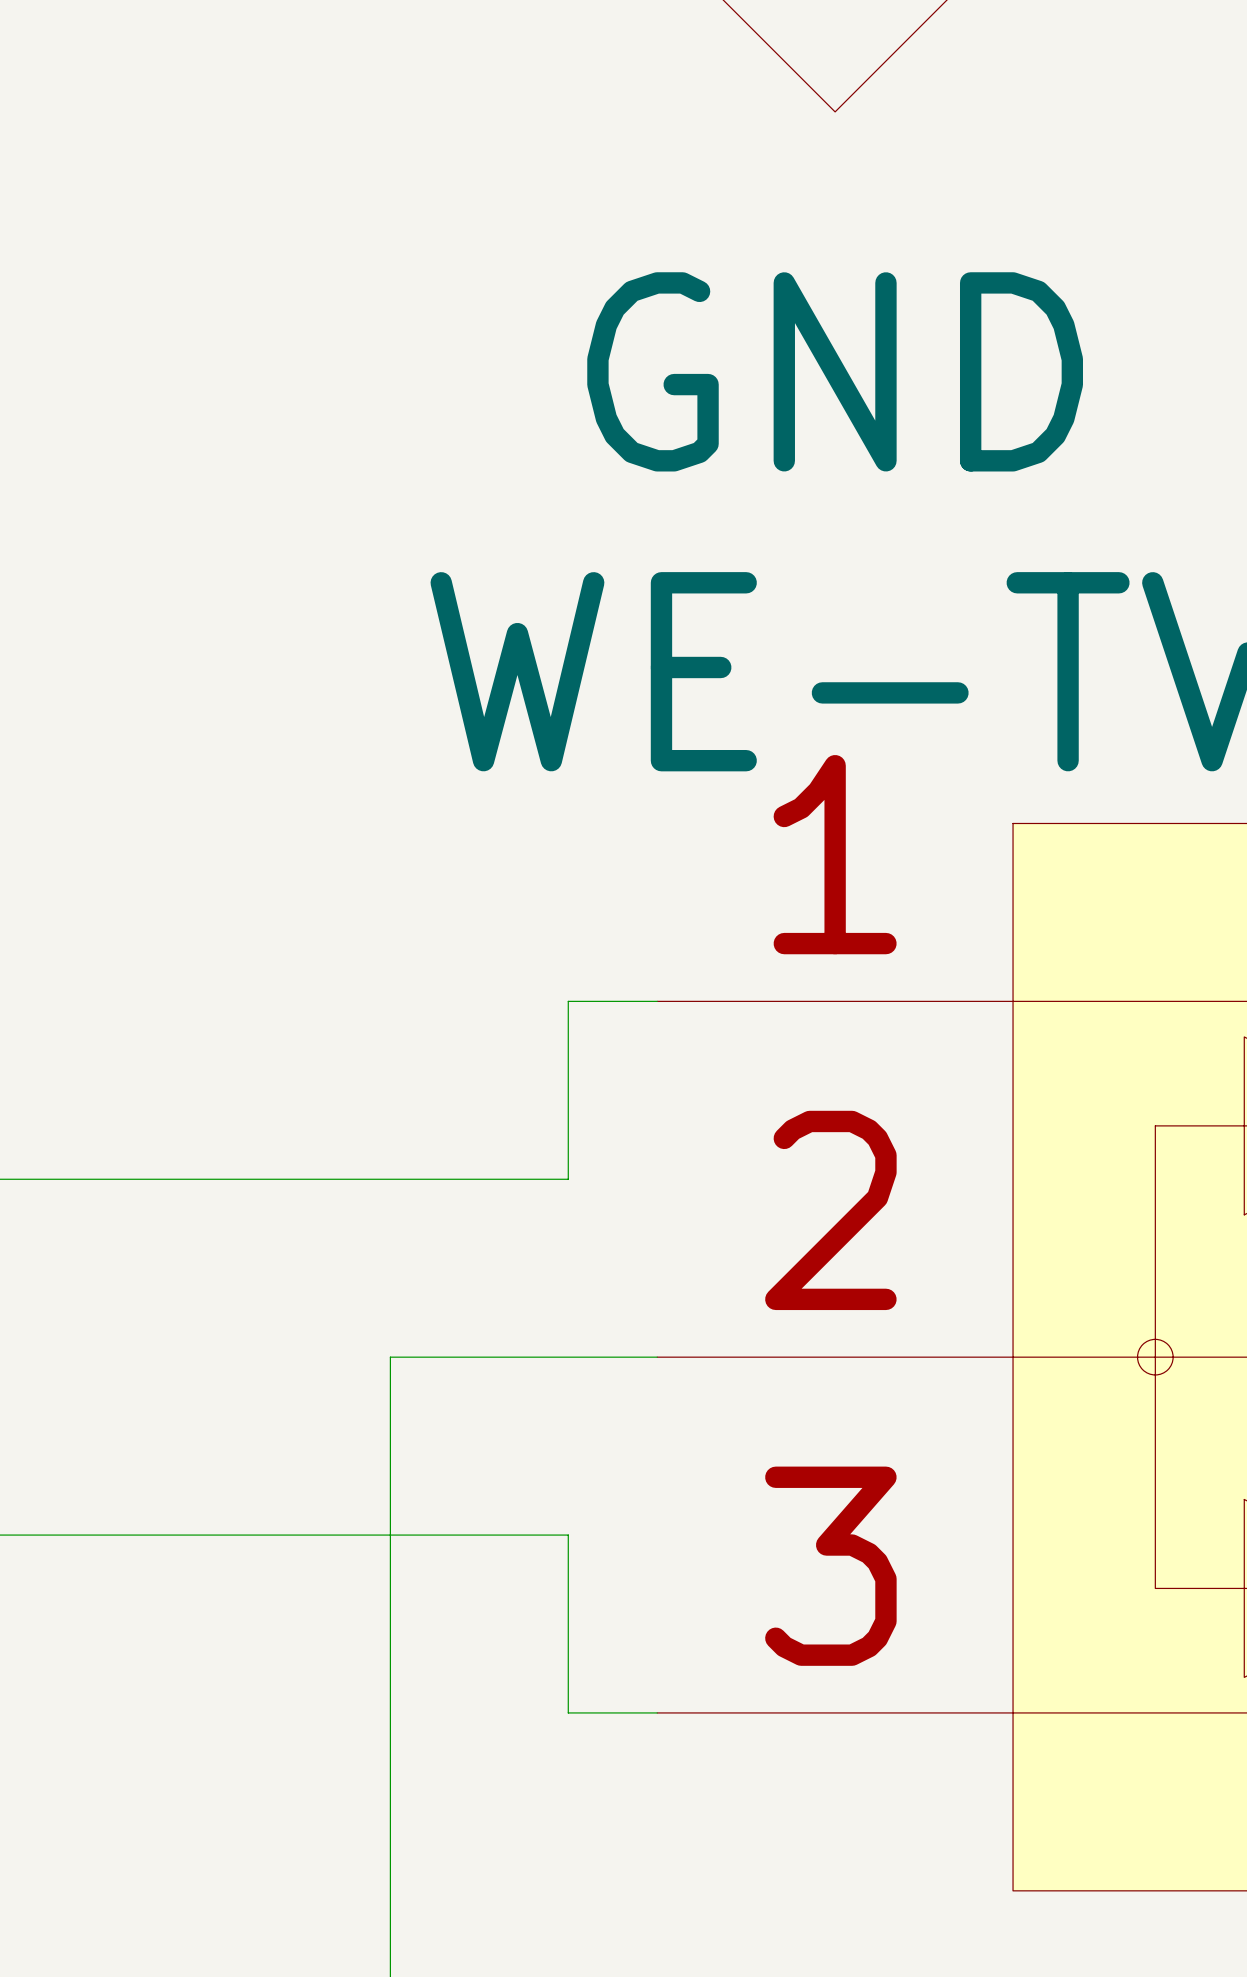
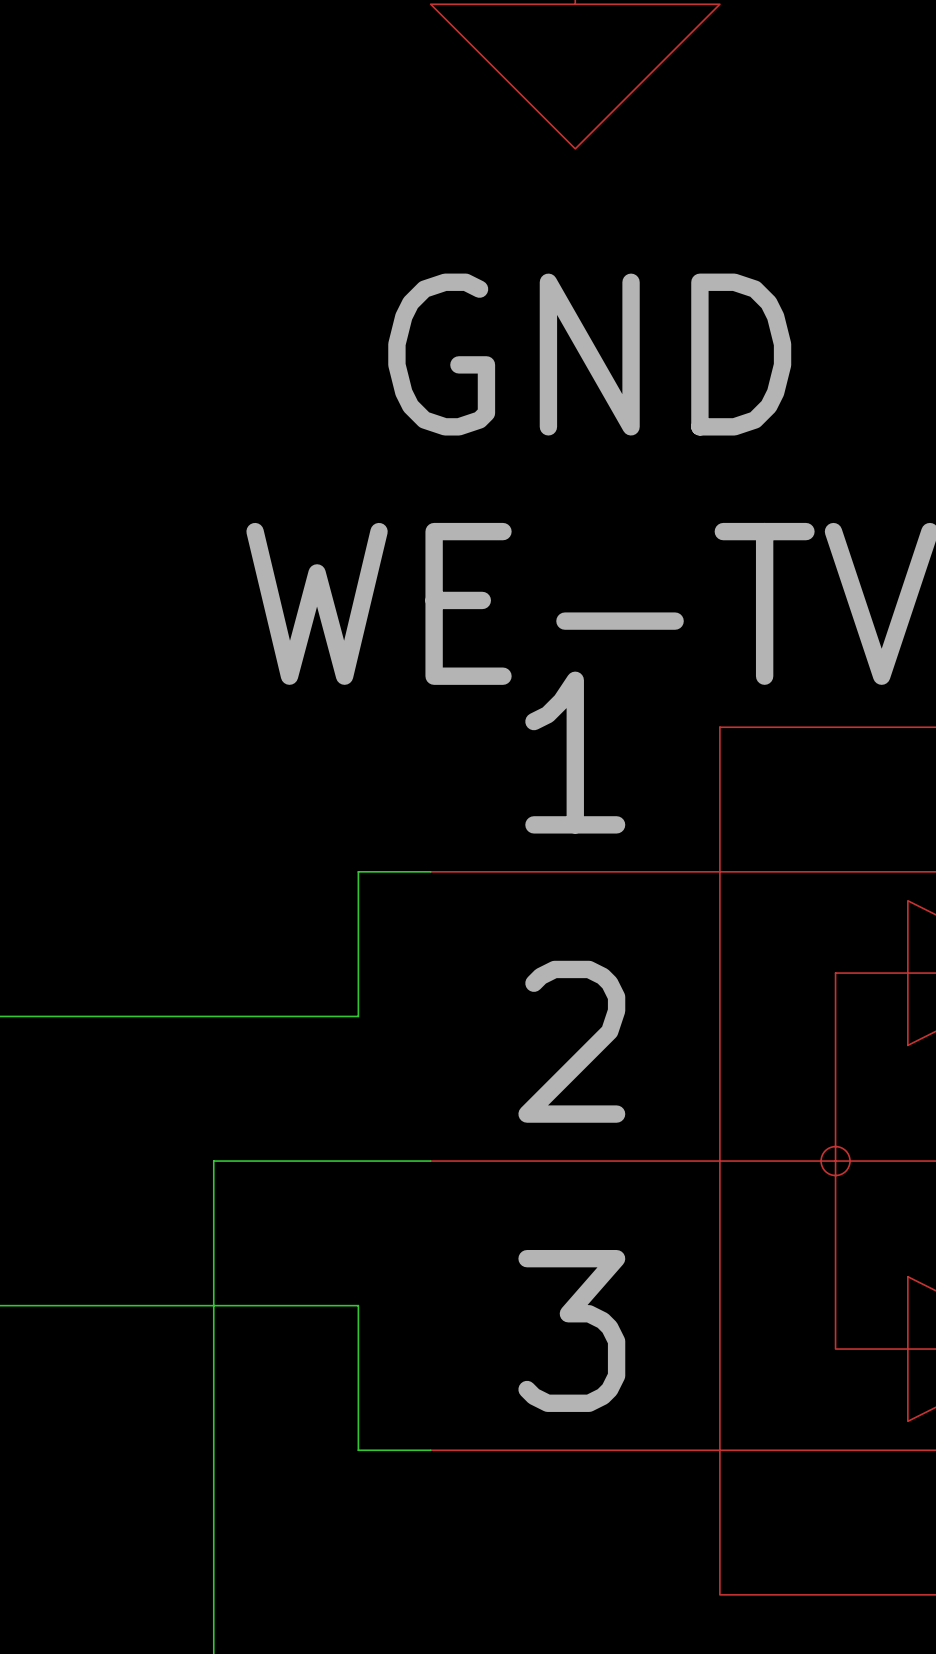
power symbol text position: GND (835, 371) -> GND (589, 354)

